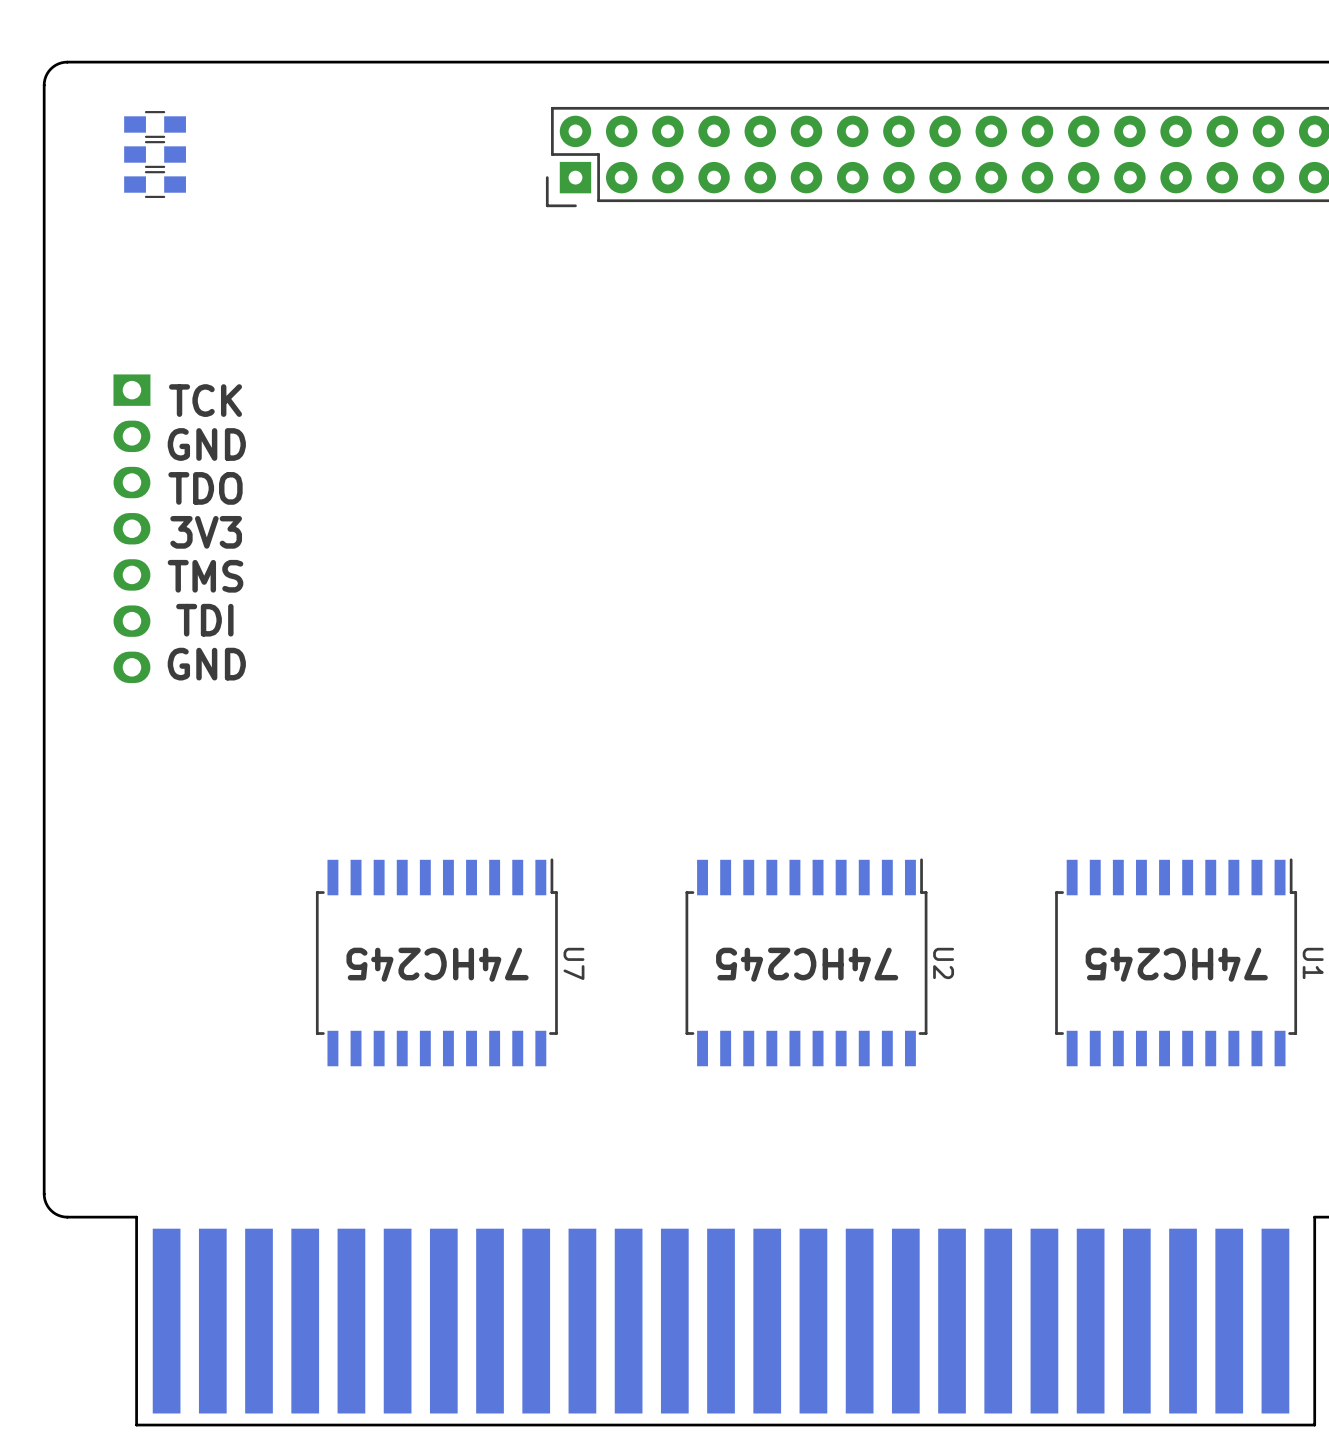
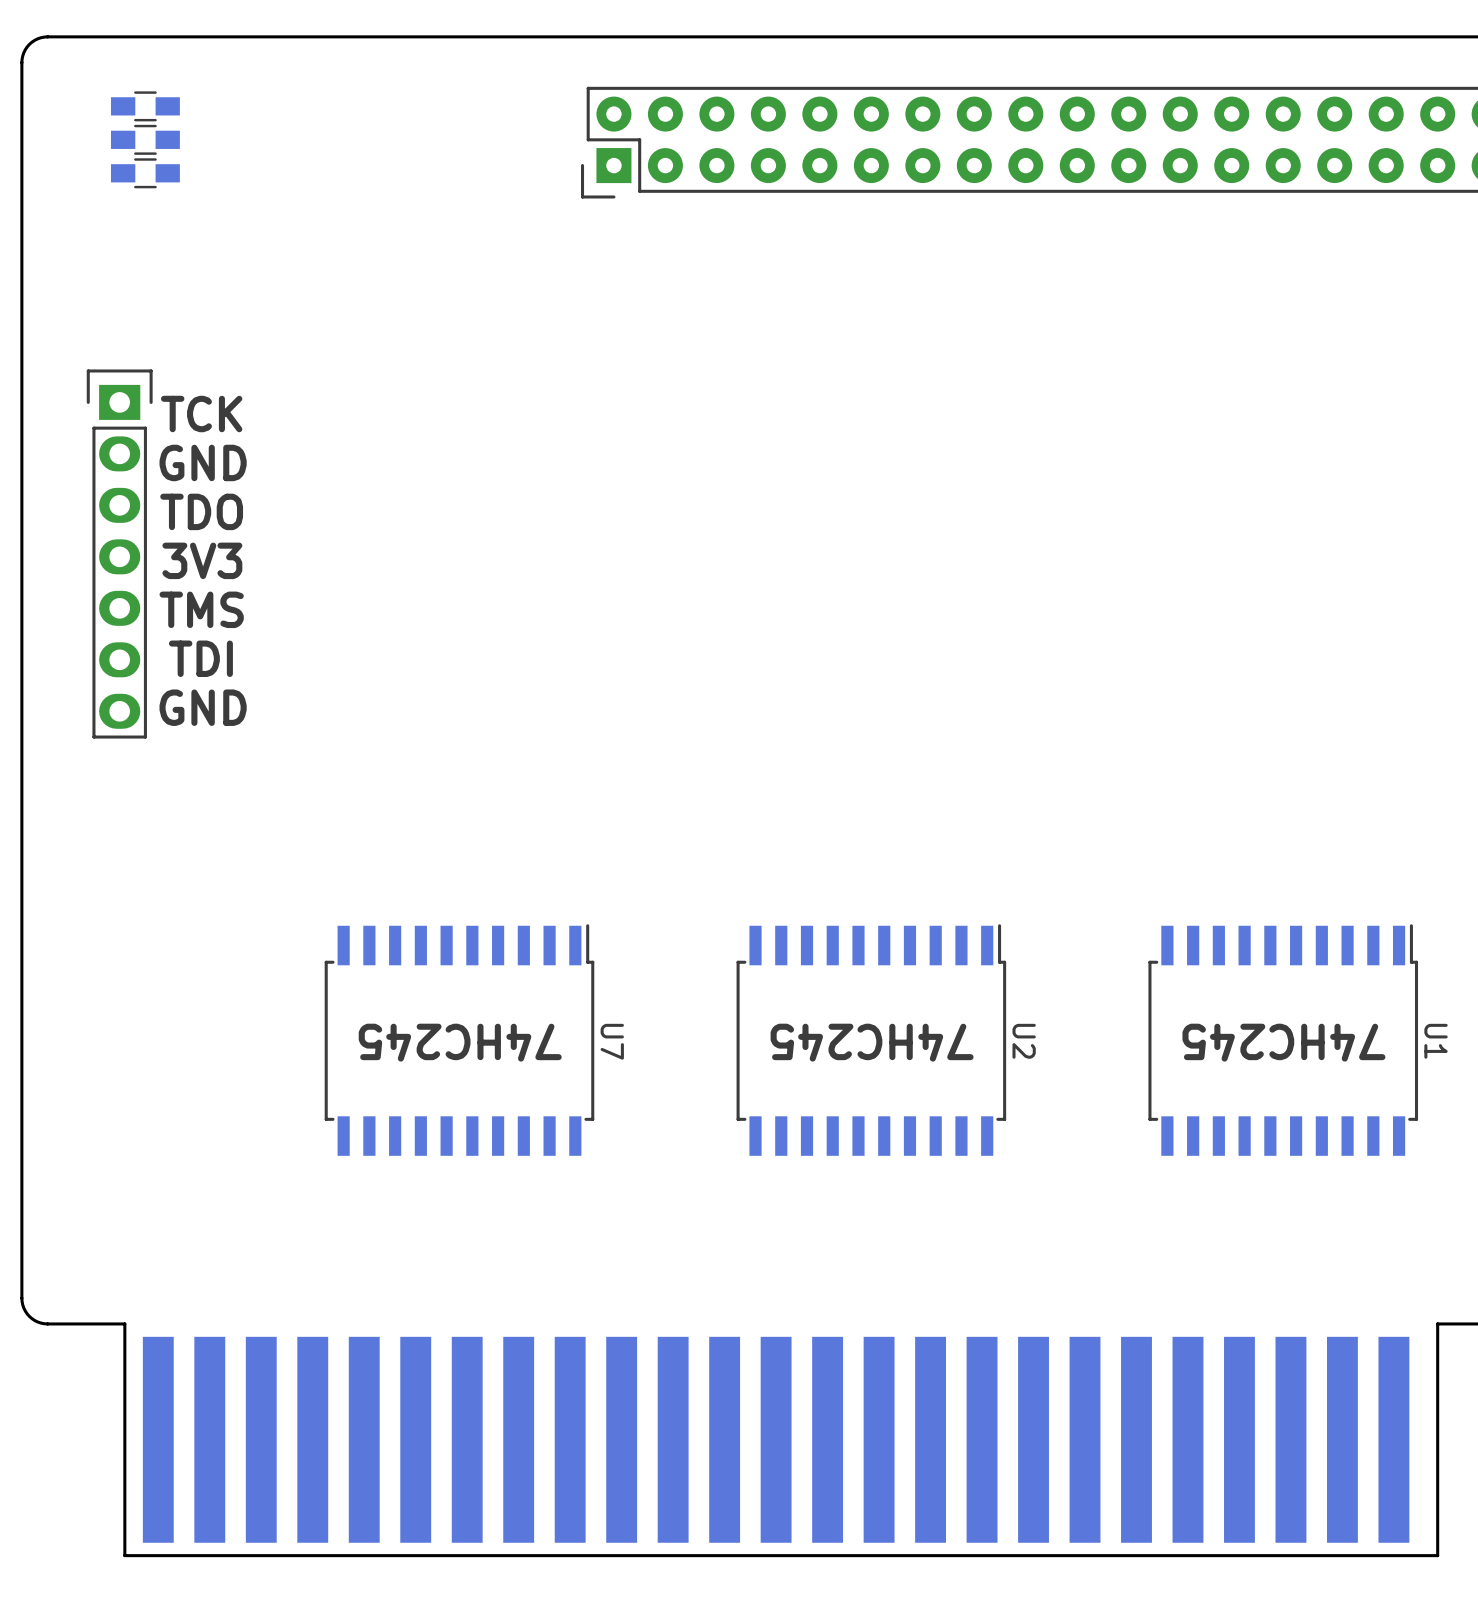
part side: top (131, 528) -> bottom (119, 554)

